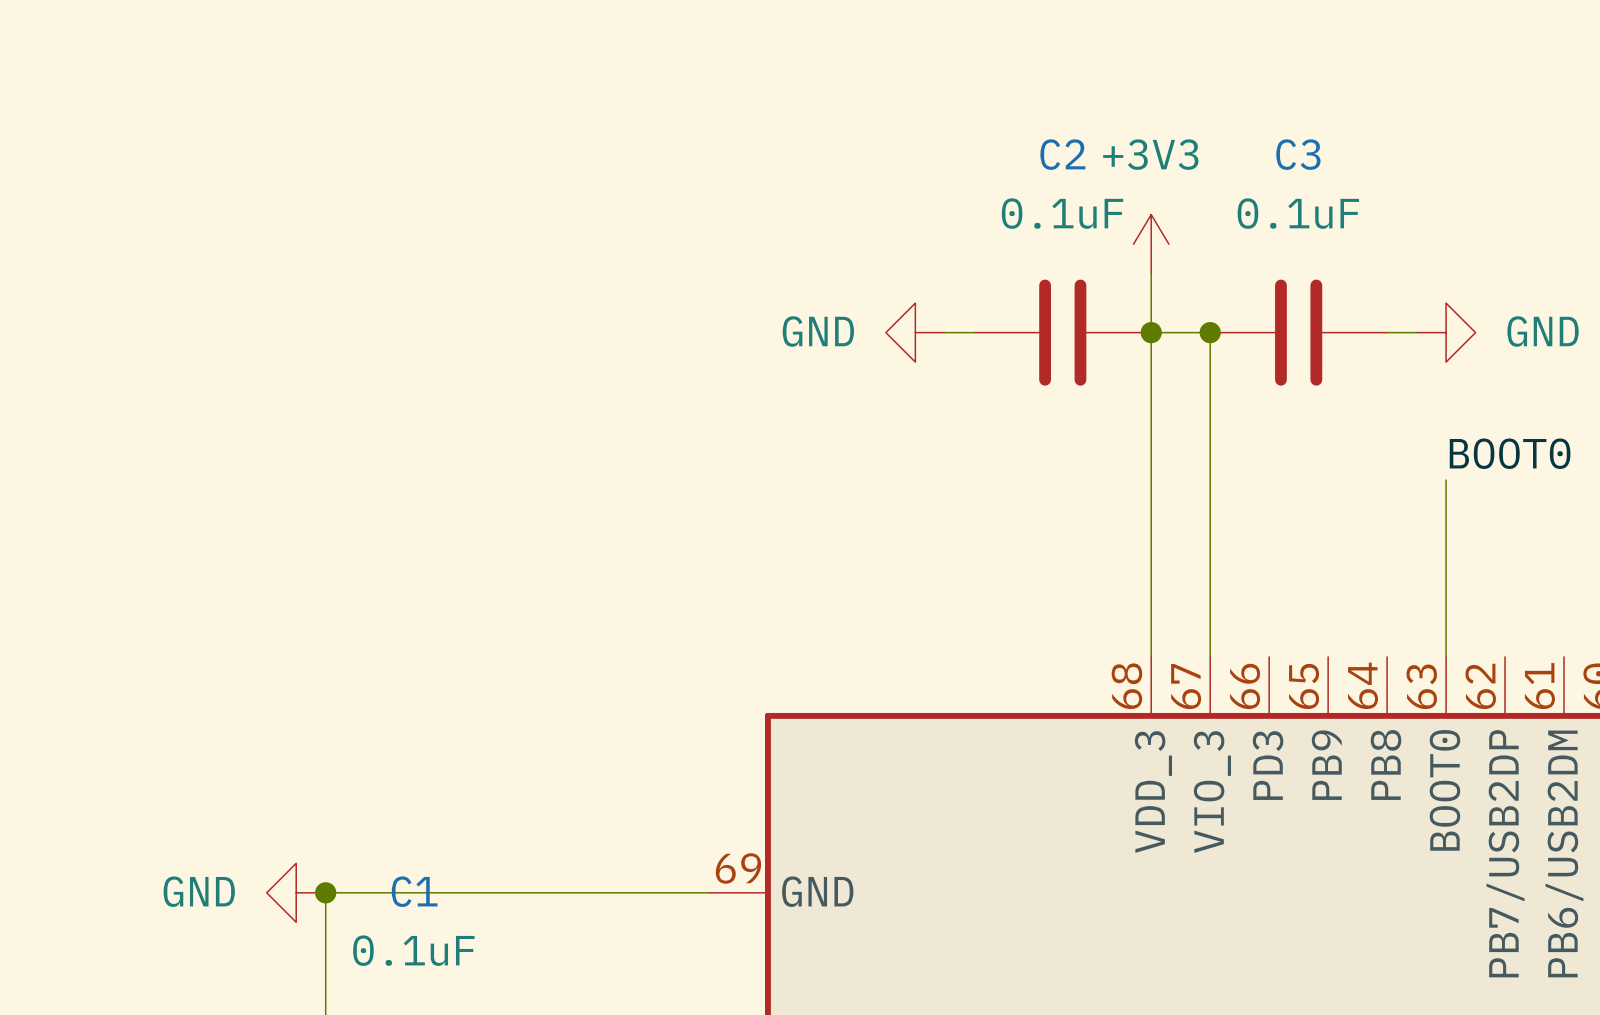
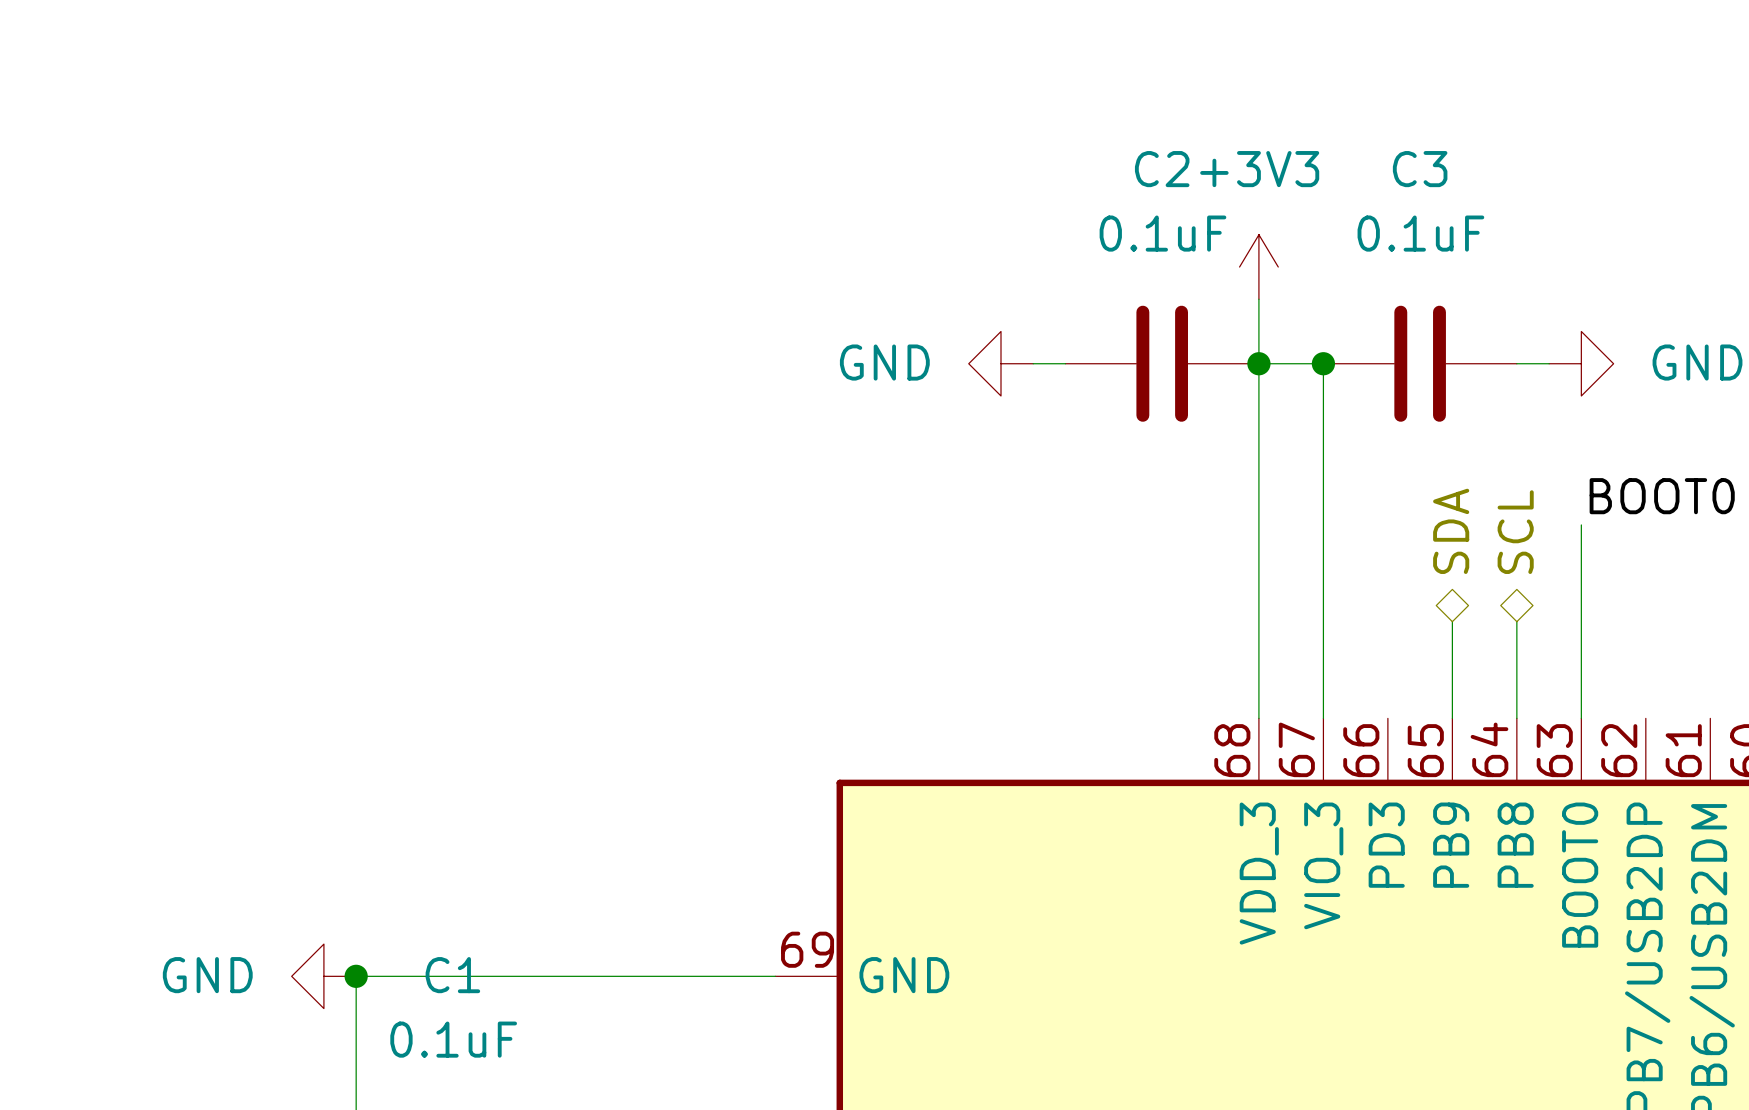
hierarchical label: none -> SDA (1451, 531)
hierarchical label: none -> SCL (1515, 532)
wire: none -> (1452, 621) (1452, 718)
wire: none -> (1516, 621) (1516, 718)

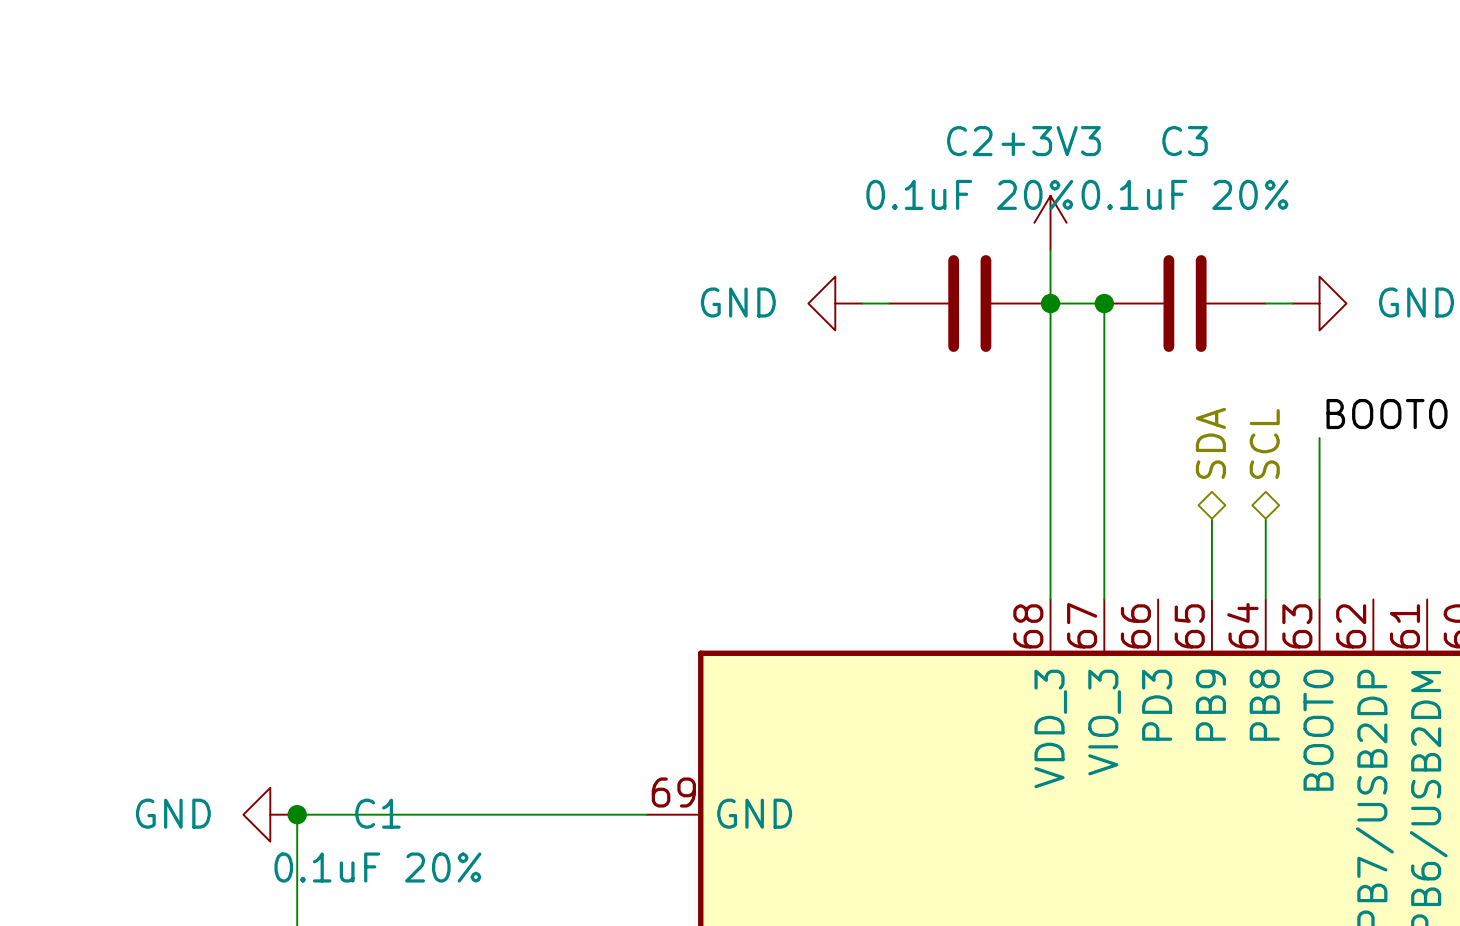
C2 value: 0.1uF (1162, 233) -> 0.1uF 20% (969, 194)
C3 value: 0.1uF (1420, 233) -> 0.1uF 20% (1185, 194)
C1 value: 0.1uF (453, 1039) -> 0.1uF 20% (377, 867)

